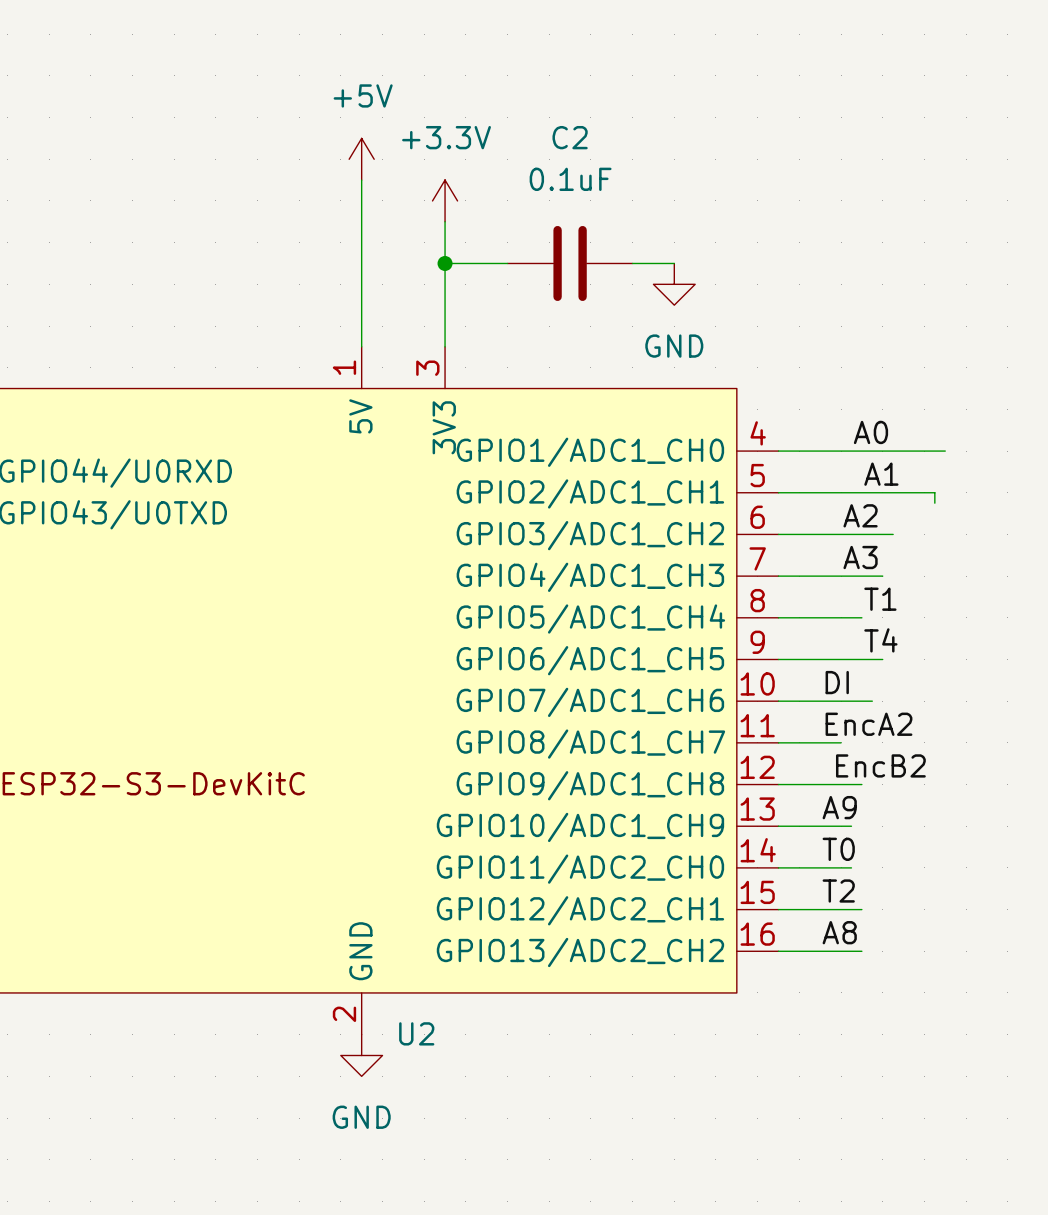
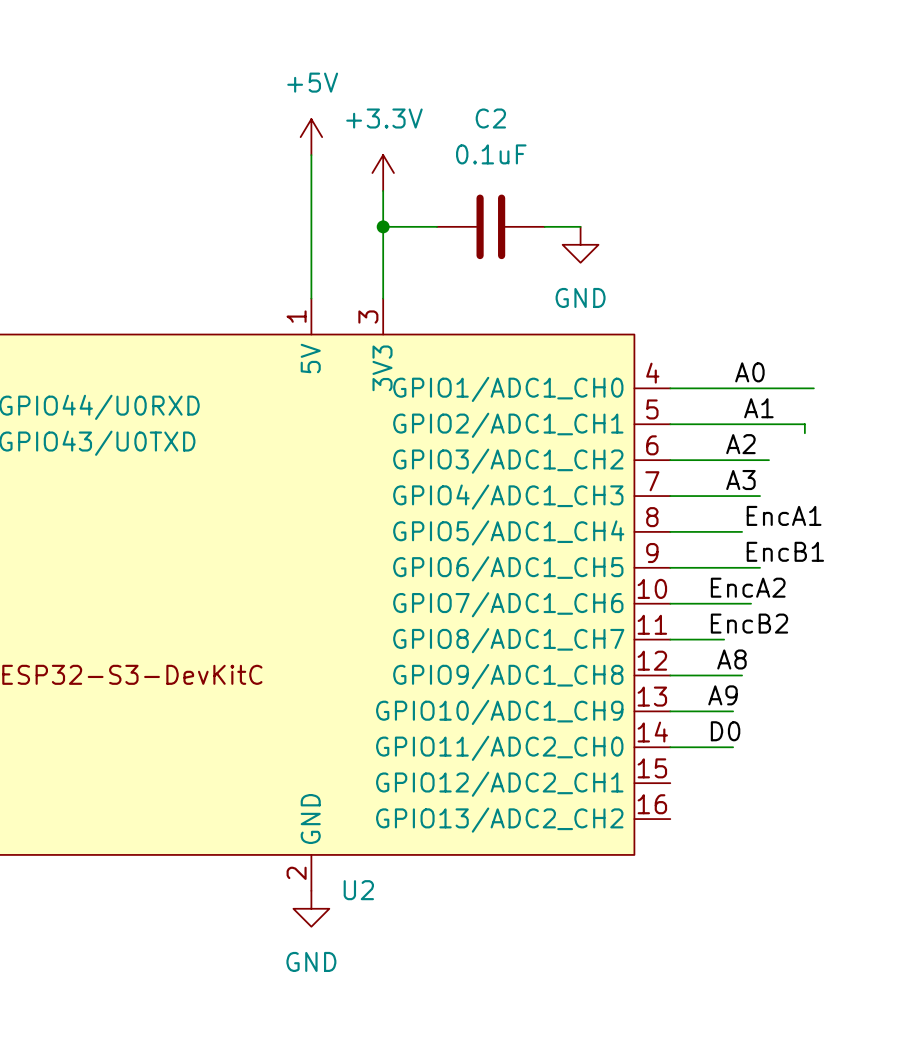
label: T1 (880, 599) -> EncA1 (784, 515)
label: T4 (880, 640) -> EncB1 (785, 551)
label: DI (837, 682) -> EncA2 (748, 587)
label: EncA2 (868, 724) -> EncB2 (749, 623)
label: EncB2 (880, 765) -> A8 (731, 659)
label: T0 (838, 849) -> D0 (725, 731)
label: T2 (838, 891) -> none
wire: (778, 909) (861, 909) -> none
label: A8 (839, 932) -> none
wire: (778, 951) (861, 951) -> none

